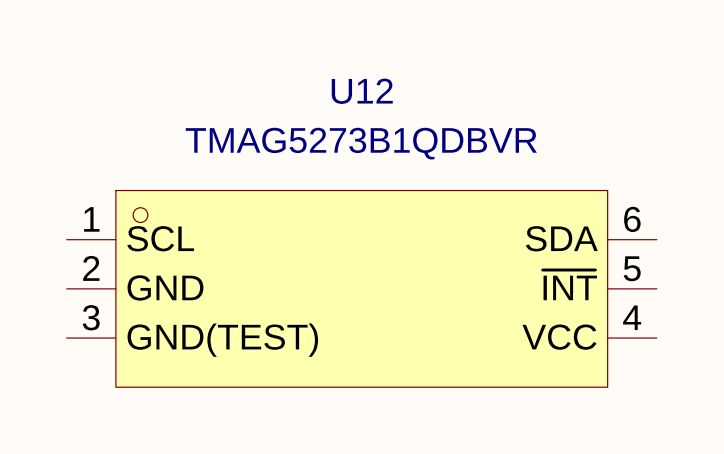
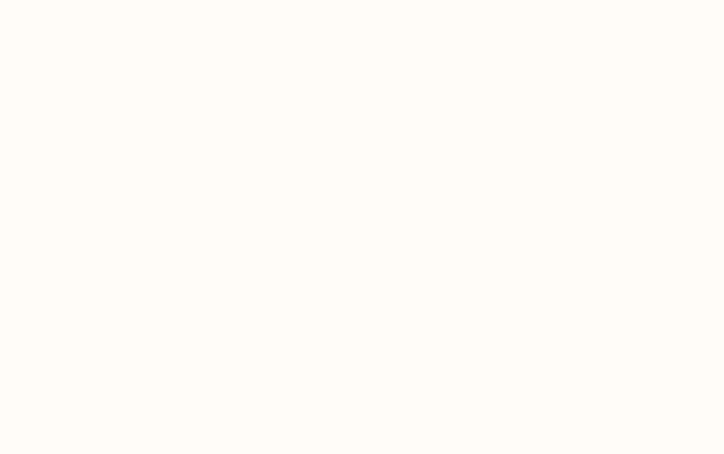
U12: TMAG5273B1QDBVR (361, 288) -> none

